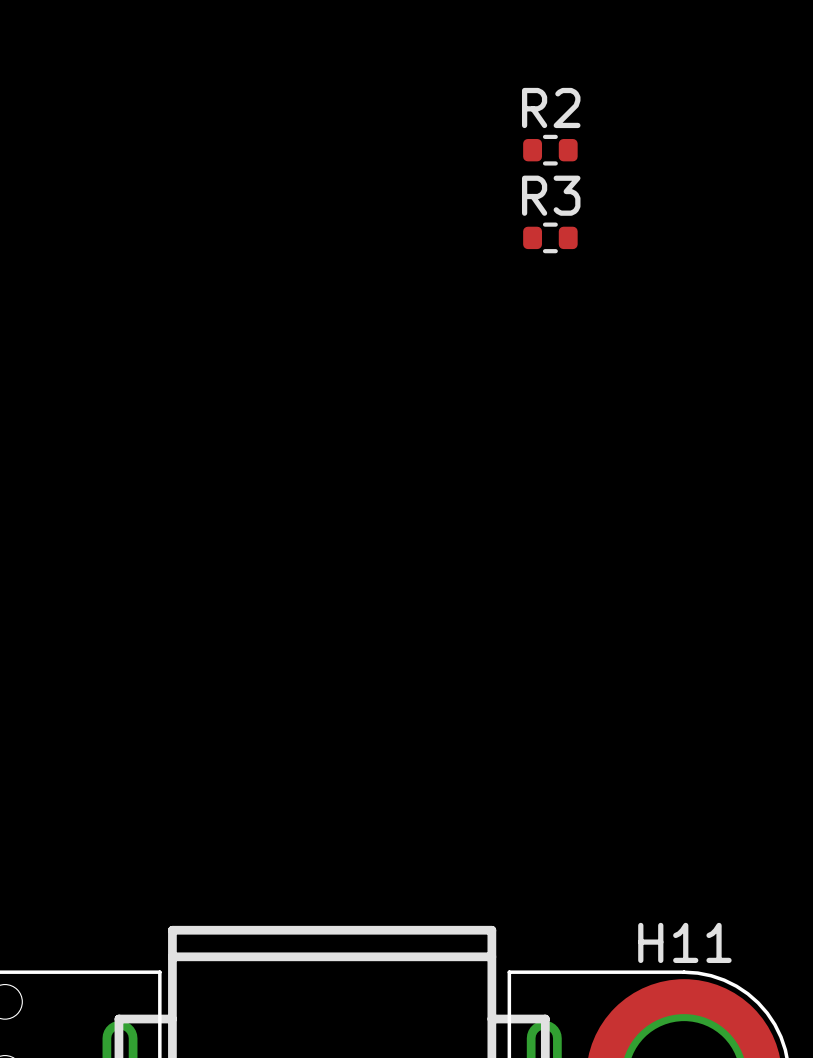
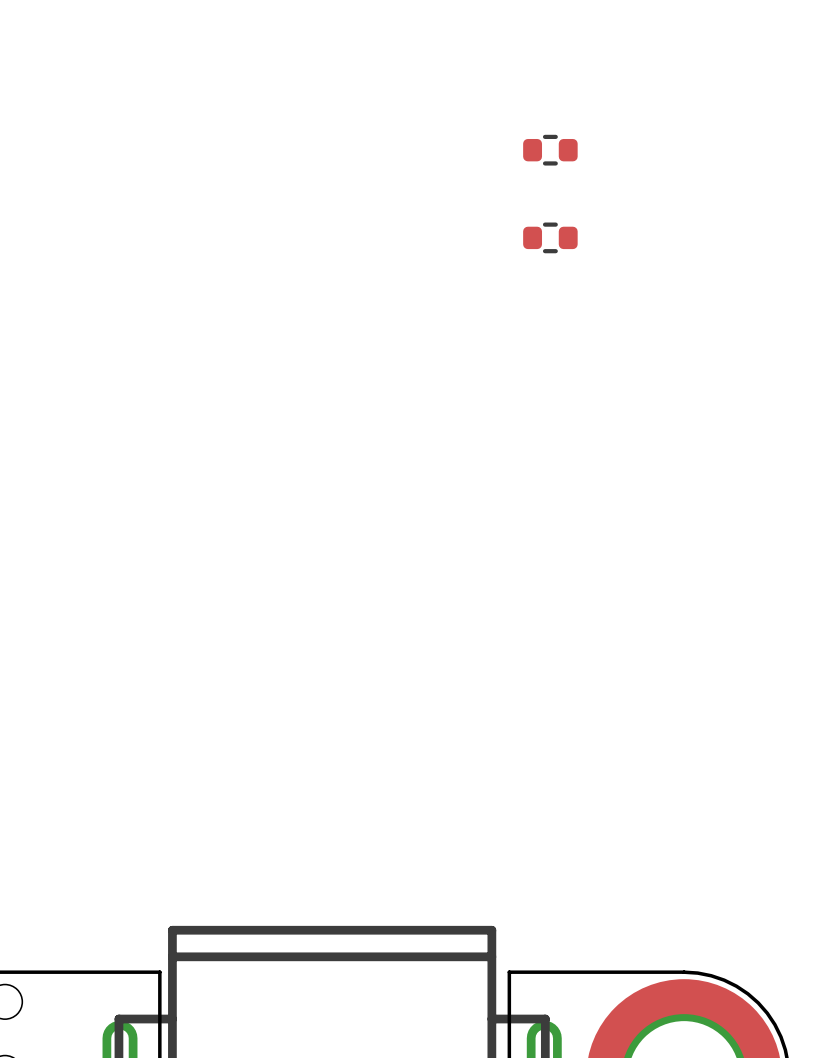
R2 name: R2 (551, 107) -> none
R3 name: R3 (551, 195) -> none
H11 name: H11 (684, 942) -> none

